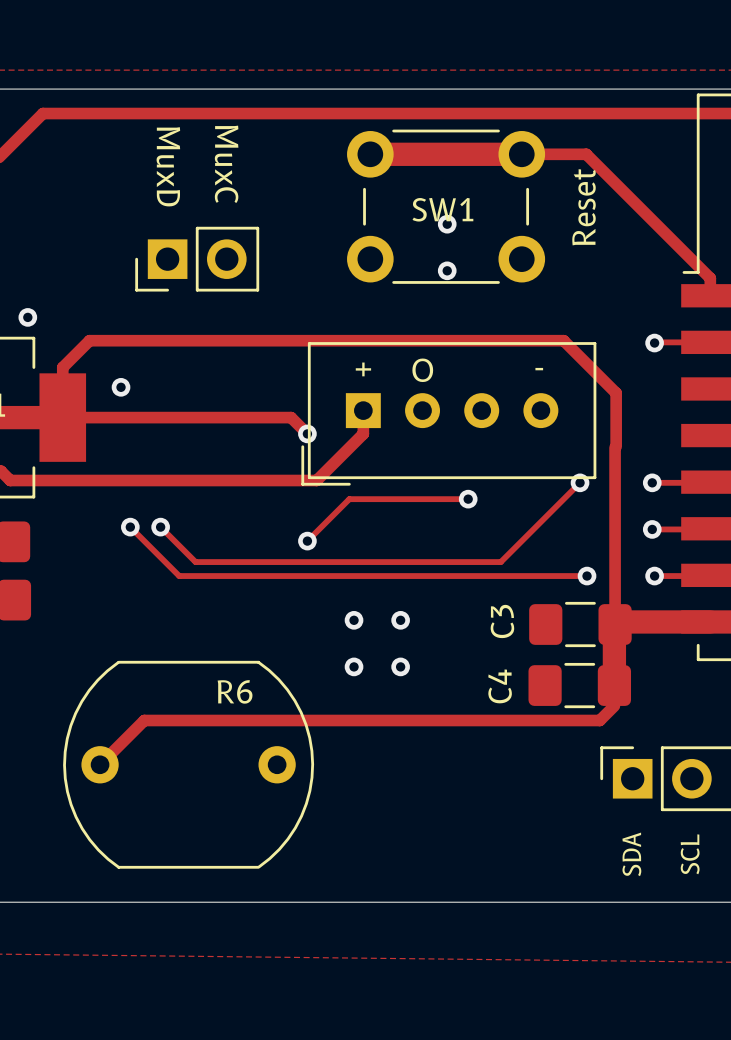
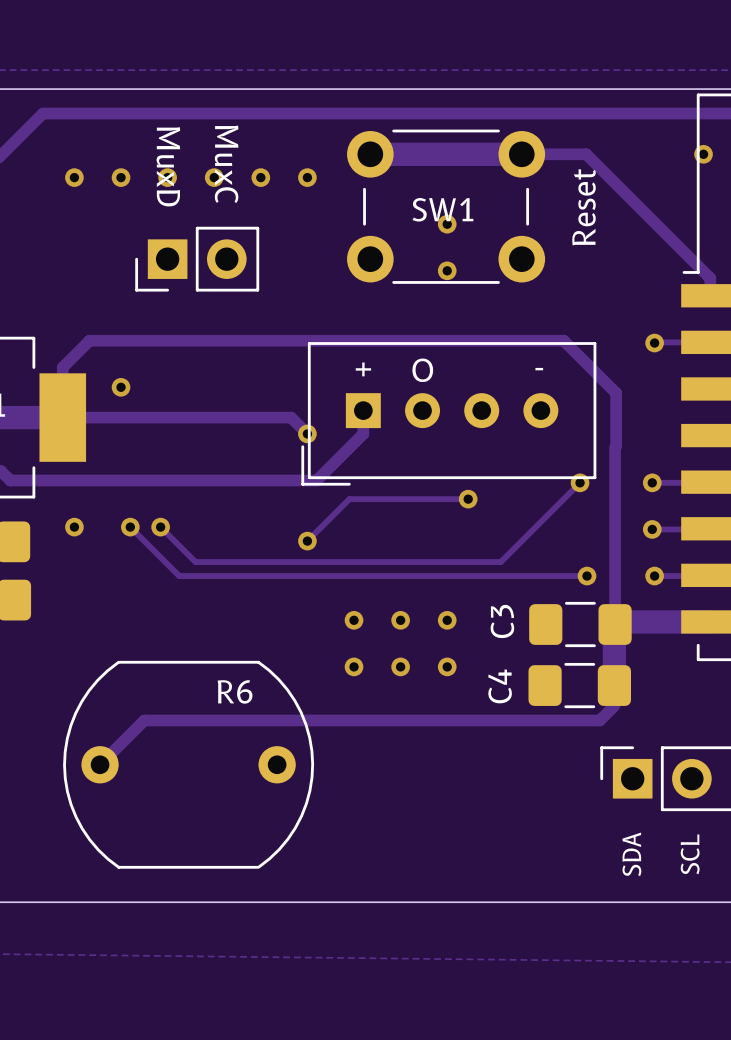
via: none -> (703, 154)
via: none -> (74, 177)
via: none -> (121, 177)
via: none -> (167, 177)
via: none -> (214, 177)
via: none -> (260, 177)
via: none -> (307, 177)
via: (27, 317) -> none
via: none -> (74, 527)
via: none -> (447, 620)
via: none -> (447, 666)

